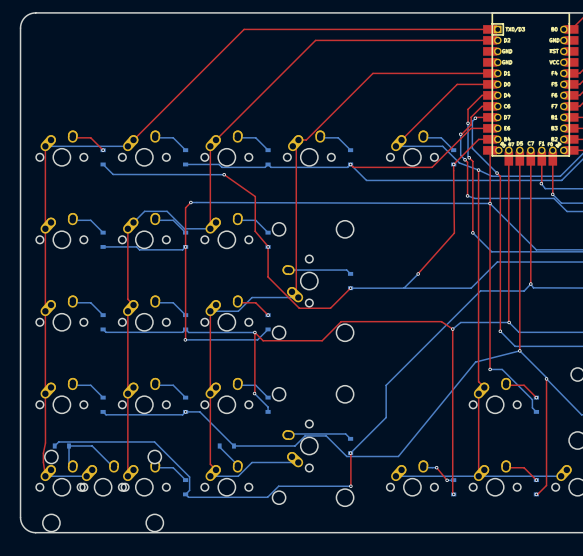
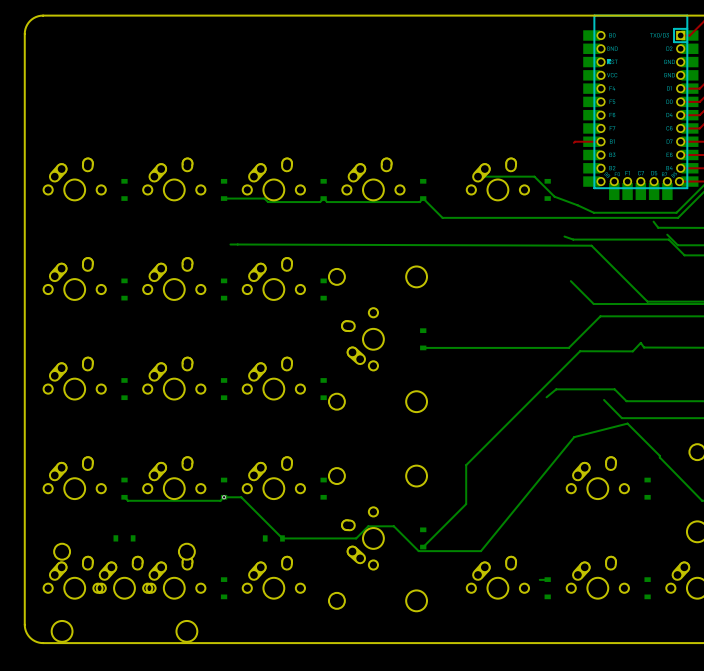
top track: (497, 29) (244, 29) (133, 140) -> none
top track: (497, 40) (315, 40) (216, 140) -> none
top track: (497, 73) (372, 73) (306, 140) (298, 140) -> none
top track: (497, 84) (457, 84) (401, 140) -> none
part side: top (530, 88) -> bottom (640, 107)
top track: (497, 95) (481, 95) (468, 109) (468, 123) -> none
top track: (497, 106) (481, 106) (471, 117) (471, 124) (460, 134) -> none
bottom track: (475, 118) (472, 121) (472, 148) (497, 173) -> none
via: (475, 118) -> none
bottom track: (468, 123) (469, 157) -> none
via: (468, 123) -> none
top track: (497, 128) (471, 128) (432, 167) (353, 167) (350, 164) -> none
bottom track: (460, 134) (460, 155) (465, 159) -> none
via: (460, 134) -> none
top track: (72, 137) (90, 137) (103, 150) -> none
bottom track: (155, 137) (173, 137) (185, 150) -> none
bottom track: (237, 137) (255, 137) (268, 150) -> none
bottom track: (320, 137) (338, 137) (350, 150) -> none
bottom track: (423, 137) (441, 137) (453, 150) -> none
top track: (497, 139) (478, 139) (453, 164) (454, 233) (417, 273) -> none
bottom track: (45, 146) (127, 146) -> none
top track: (45, 146) (45, 443) (43, 453) (45, 476) -> none
top track: (210, 146) (210, 228) -> none
top track: (292, 146) (296, 149) (296, 295) (298, 297) -> none
via: (103, 150) -> none
top track: (498, 150) (490, 150) (490, 369) -> none
top track: (508, 150) (509, 322) -> none
top track: (519, 150) (519, 350) -> none
top track: (530, 150) (530, 284) -> none
top track: (541, 150) (541, 183) -> none
top track: (552, 150) (552, 194) -> none
top track: (469, 157) (472, 161) (472, 232) -> none
via: (469, 157) -> none
top track: (465, 159) (467, 162) (467, 195) -> none
via: (465, 159) -> none
bottom track: (103, 164) (113, 174) (224, 174) -> none
via: (350, 164) -> none
via: (453, 164) -> none
top track: (478, 170) (478, 381) (484, 387) -> none
via: (478, 170) -> none
top track: (497, 173) (500, 176) (500, 331) -> none
via: (497, 173) -> none
top track: (224, 174) (255, 196) (255, 231) (268, 246) (268, 277) (299, 308) (330, 308) (350, 288) -> none
via: (224, 174) -> none
via: (541, 183) -> none
via: (552, 194) -> none
via: (467, 195) -> none
top track: (190, 202) (185, 207) (185, 339) -> none
via: (190, 202) -> none
via: (490, 203) -> none
bottom track: (72, 220) (90, 220) (103, 232) -> none
bottom track: (155, 220) (173, 220) (185, 232) -> none
bottom track: (237, 220) (255, 220) (268, 232) -> none
bottom track: (133, 222) (144, 211) (167, 211) (184, 228) (210, 228) -> none
top track: (127, 228) (127, 299) (133, 304) -> none
via: (472, 232) -> none
bottom track: (103, 246) (136, 246) (139, 249) (182, 249) (185, 246) -> none
via: (185, 246) -> none
via: (268, 246) -> none
bottom track: (287, 270) (346, 270) (350, 273) -> none
bottom track: (418, 274) (404, 288) -> none
via: (418, 274) -> none
via: (530, 284) -> none
via: (350, 288) -> none
bottom track: (298, 297) (252, 297) (238, 311) (210, 311) -> none
bottom track: (72, 302) (90, 302) (103, 315) -> none
bottom track: (155, 302) (173, 302) (185, 315) -> none
top track: (237, 302) (255, 302) (268, 315) -> none
top track: (127, 311) (127, 476) -> none
top track: (210, 311) (210, 464) (216, 469) -> none
via: (268, 315) -> none
via: (509, 322) -> none
bottom track: (103, 329) (106, 332) (182, 332) (185, 329) (188, 332) (254, 332) -> none
bottom track: (268, 329) (257, 339) (185, 339) -> none
via: (452, 329) -> none
via: (500, 331) -> none
via: (254, 332) -> none
via: (185, 339) -> none
via: (519, 350) -> none
bottom track: (490, 369) (502, 369) (532, 399) (532, 407) (536, 411) -> none
via: (490, 369) -> none
top track: (546, 378) (546, 485) (536, 494) -> none
via: (546, 378) -> none
bottom track: (72, 385) (90, 385) (103, 397) -> none
bottom track: (155, 385) (173, 385) (185, 397) -> none
bottom track: (237, 385) (255, 385) (268, 397) -> none
top track: (506, 385) (524, 385) (536, 397) -> none
bottom track: (254, 393) (268, 407) (268, 411) -> none
top track: (254, 393) (254, 332) (263, 340) (322, 340) (341, 321) (441, 321) (452, 329) (453, 494) -> none
via: (254, 393) -> none
top track: (478, 393) (478, 476) -> none
via: (536, 397) -> none
bottom track: (289, 435) (345, 433) (350, 438) -> none
bottom track: (54, 446) (58, 441) (154, 441) (189, 477) (189, 490) (185, 494) (188, 497) (267, 497) (278, 486) (350, 486) -> none
part position: (61, 446) -> (124, 538)
bottom track: (219, 446) (237, 465) -> none
top track: (350, 453) (350, 486) -> none
via: (350, 453) -> none
bottom track: (298, 462) (252, 462) (238, 476) (210, 476) -> none
bottom track: (72, 467) (69, 464) (69, 446) (92, 446) (113, 467) -> none
bottom track: (155, 467) (173, 467) (185, 480) -> none
bottom track: (436, 467) (423, 467) -> none
top track: (436, 467) (447, 480) -> none
via: (436, 467) -> none
top track: (506, 467) (524, 467) (536, 480) -> none
bottom track: (45, 476) (86, 476) -> none
bottom track: (395, 476) (561, 476) -> none
via: (447, 480) -> none
via: (536, 480) -> none
via: (350, 486) -> none
via: (453, 494) -> none
via: (536, 494) -> none

